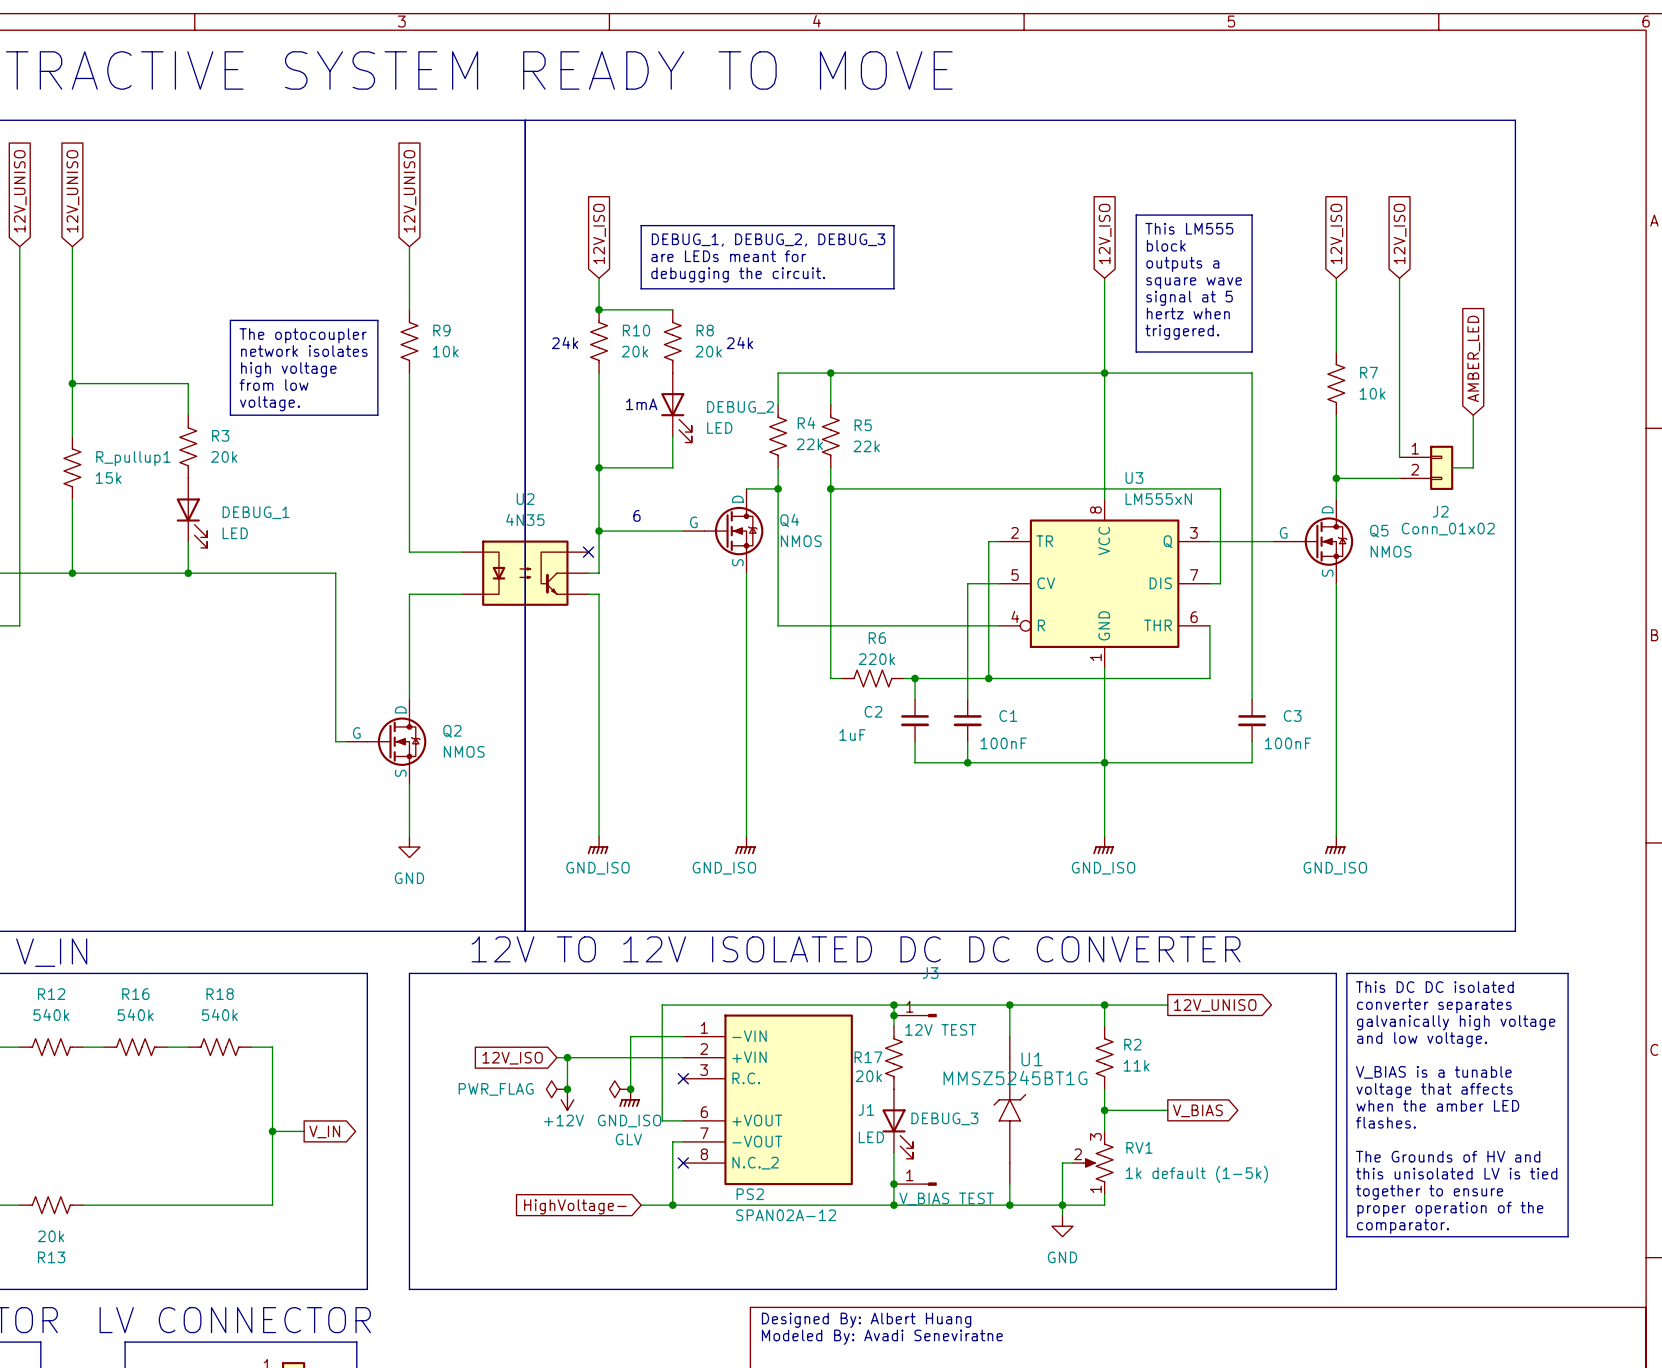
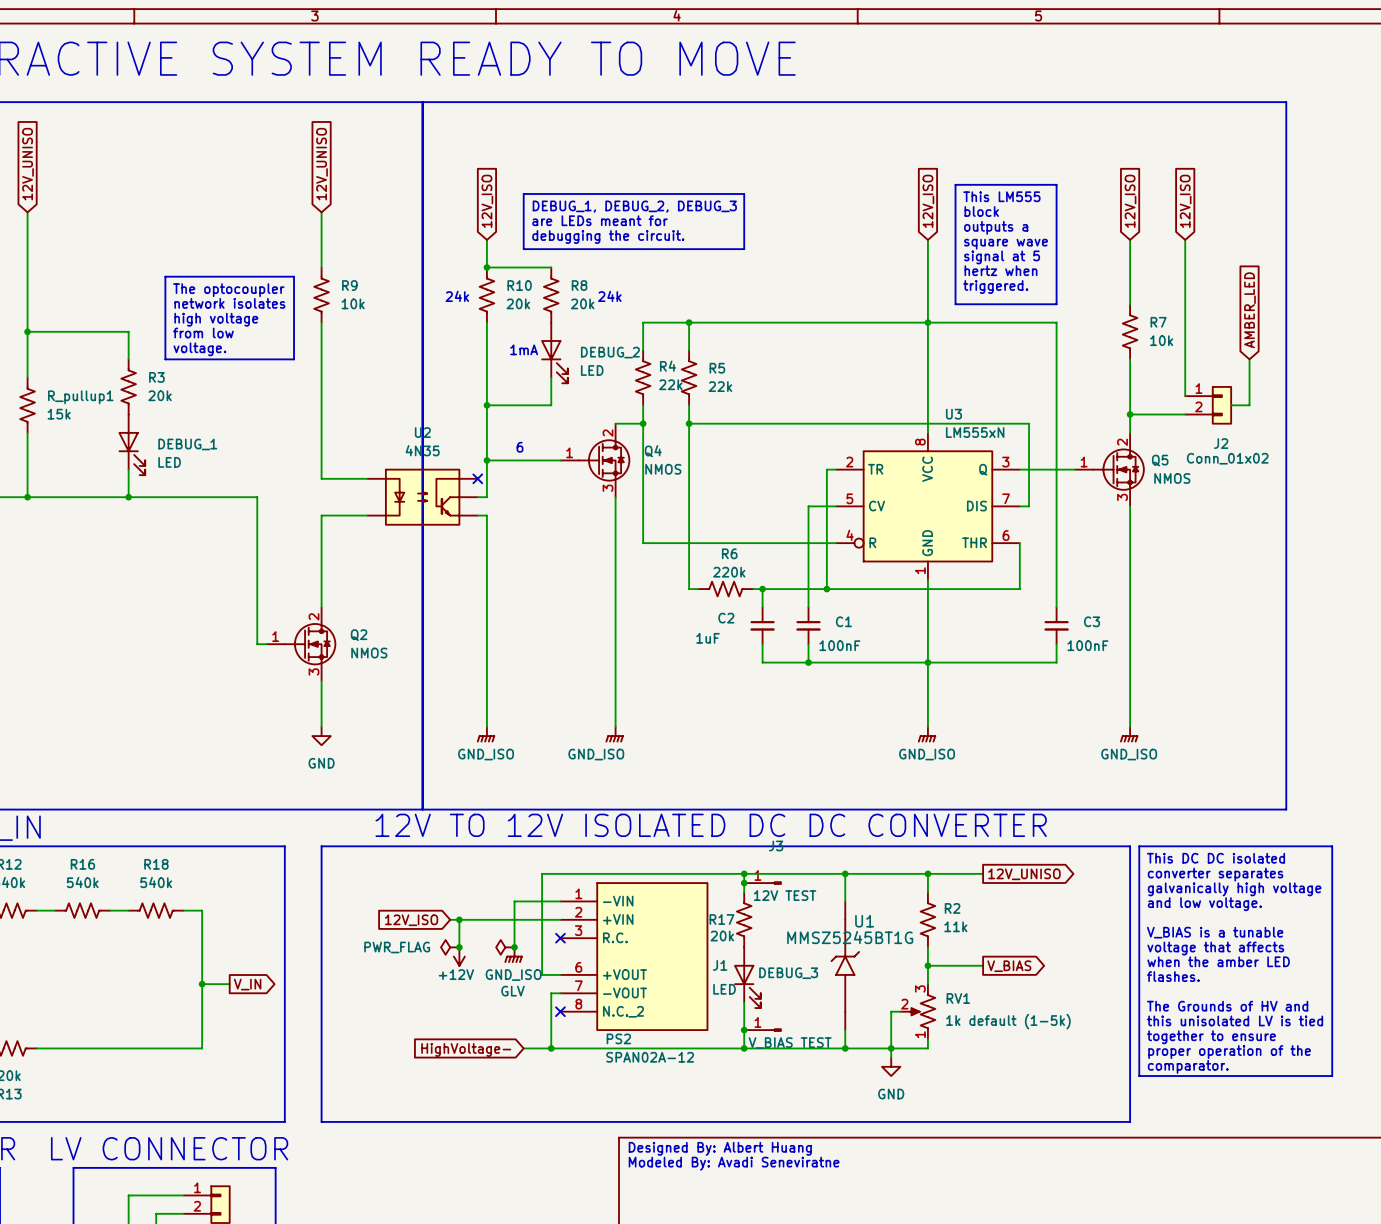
Q4 symbol: [683, 488, 764, 574] -> [560, 423, 631, 498]
Q5 symbol: [1273, 499, 1354, 584] -> [1074, 432, 1145, 507]
Q2 symbol: [346, 699, 427, 784] -> [266, 607, 337, 681]

